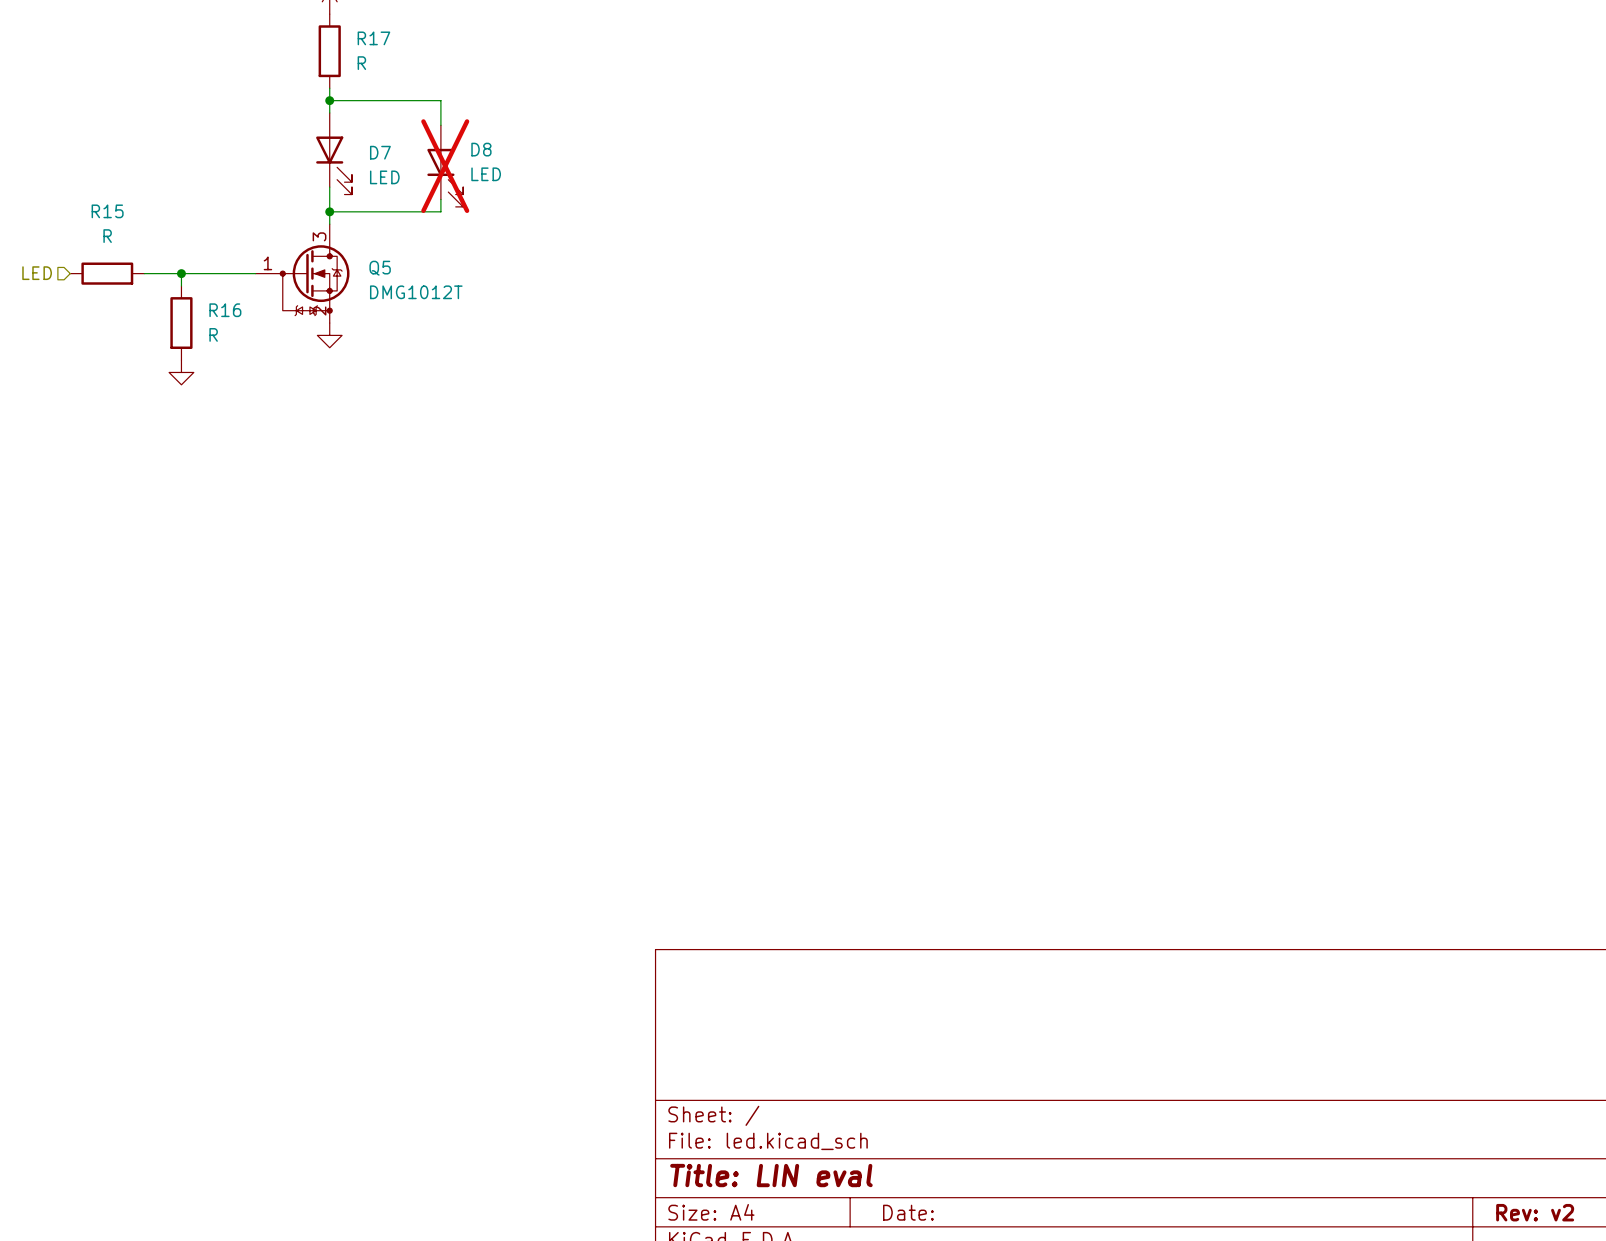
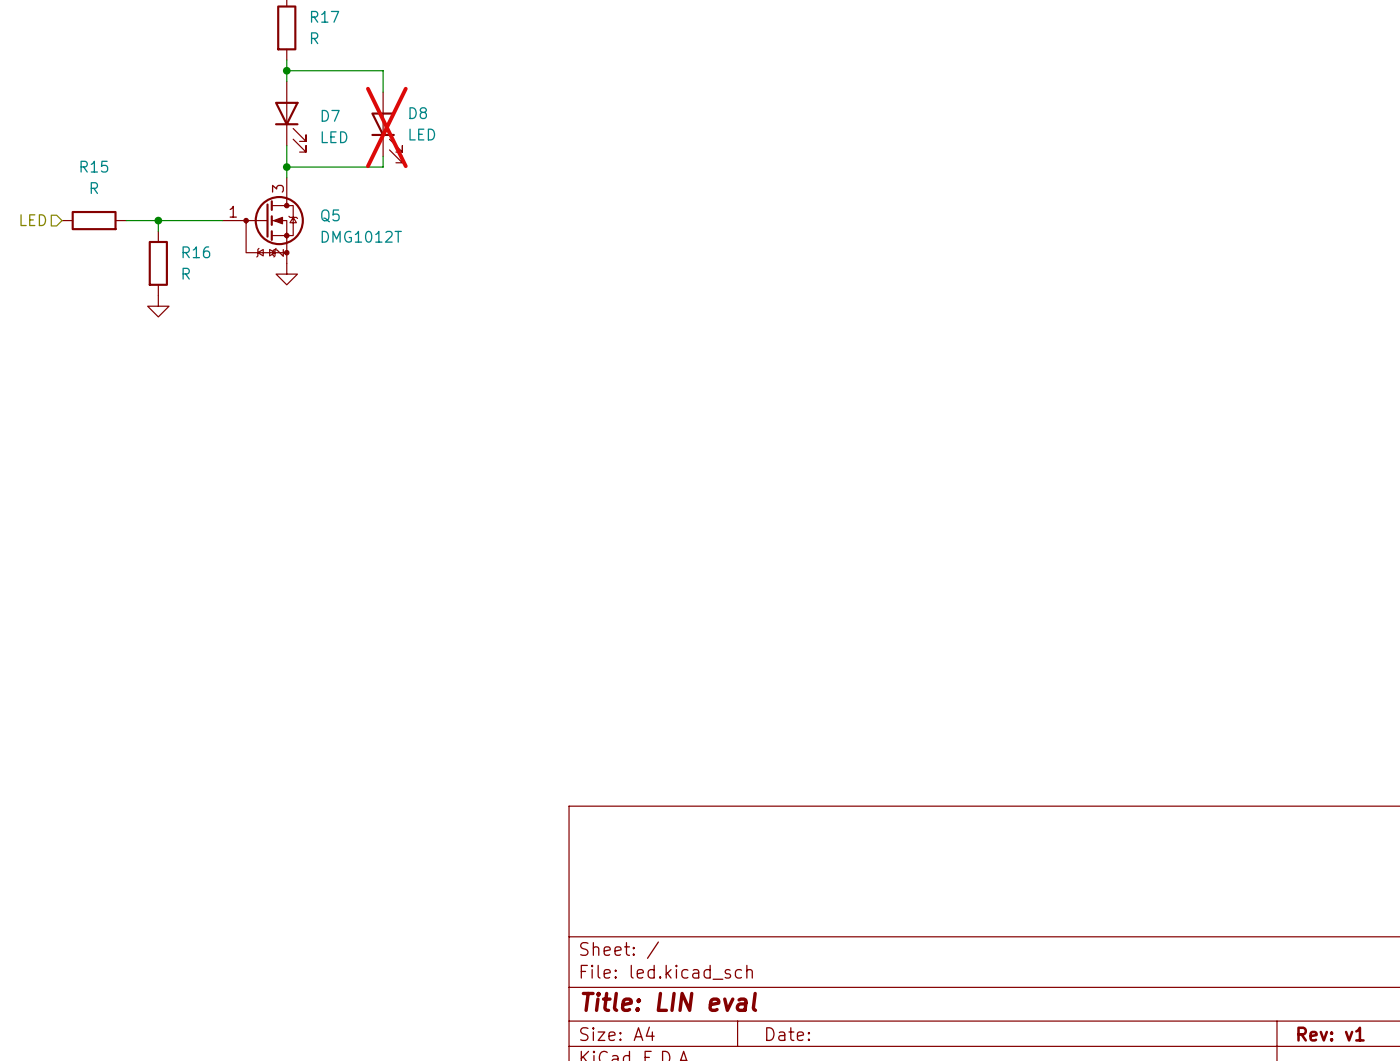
title block: Rev: v2 (1535, 1212) -> Rev: v1 (1331, 1034)

